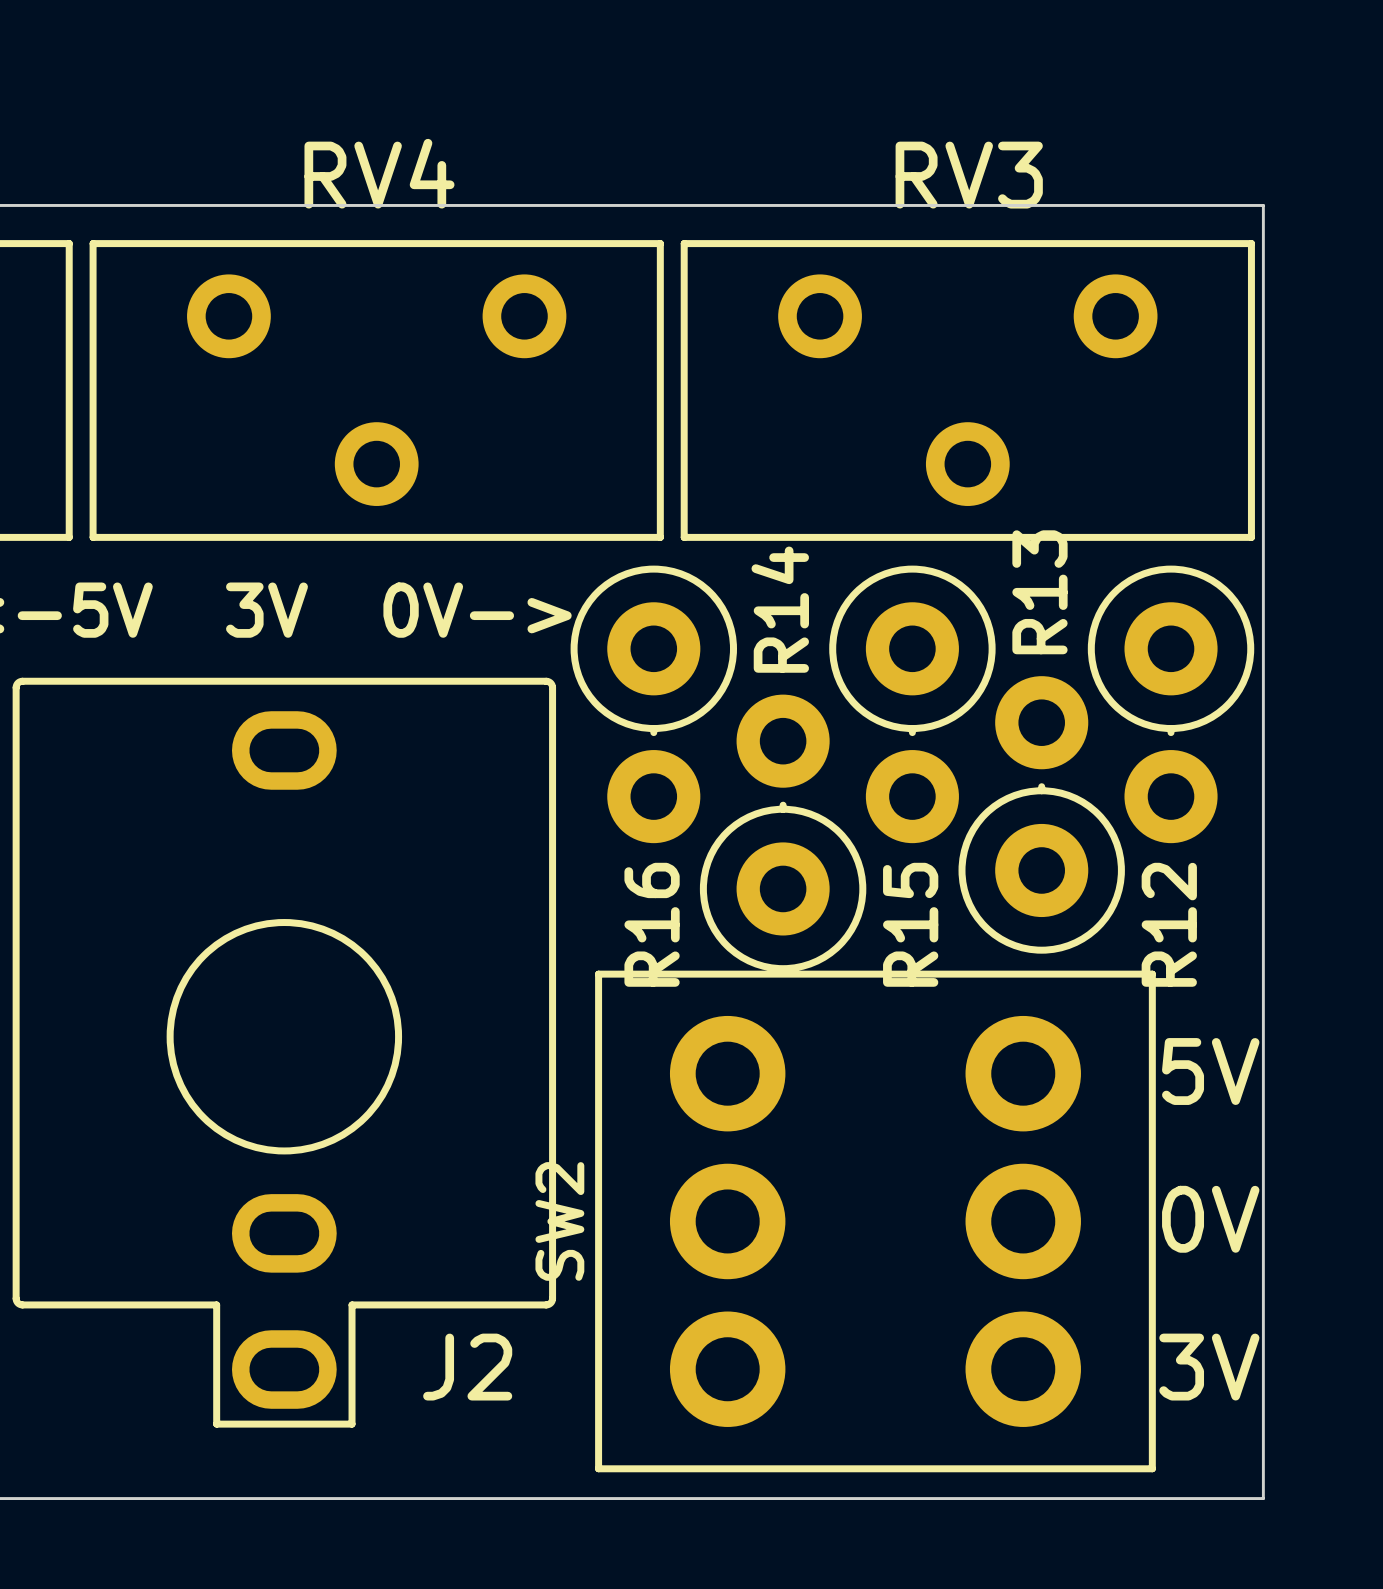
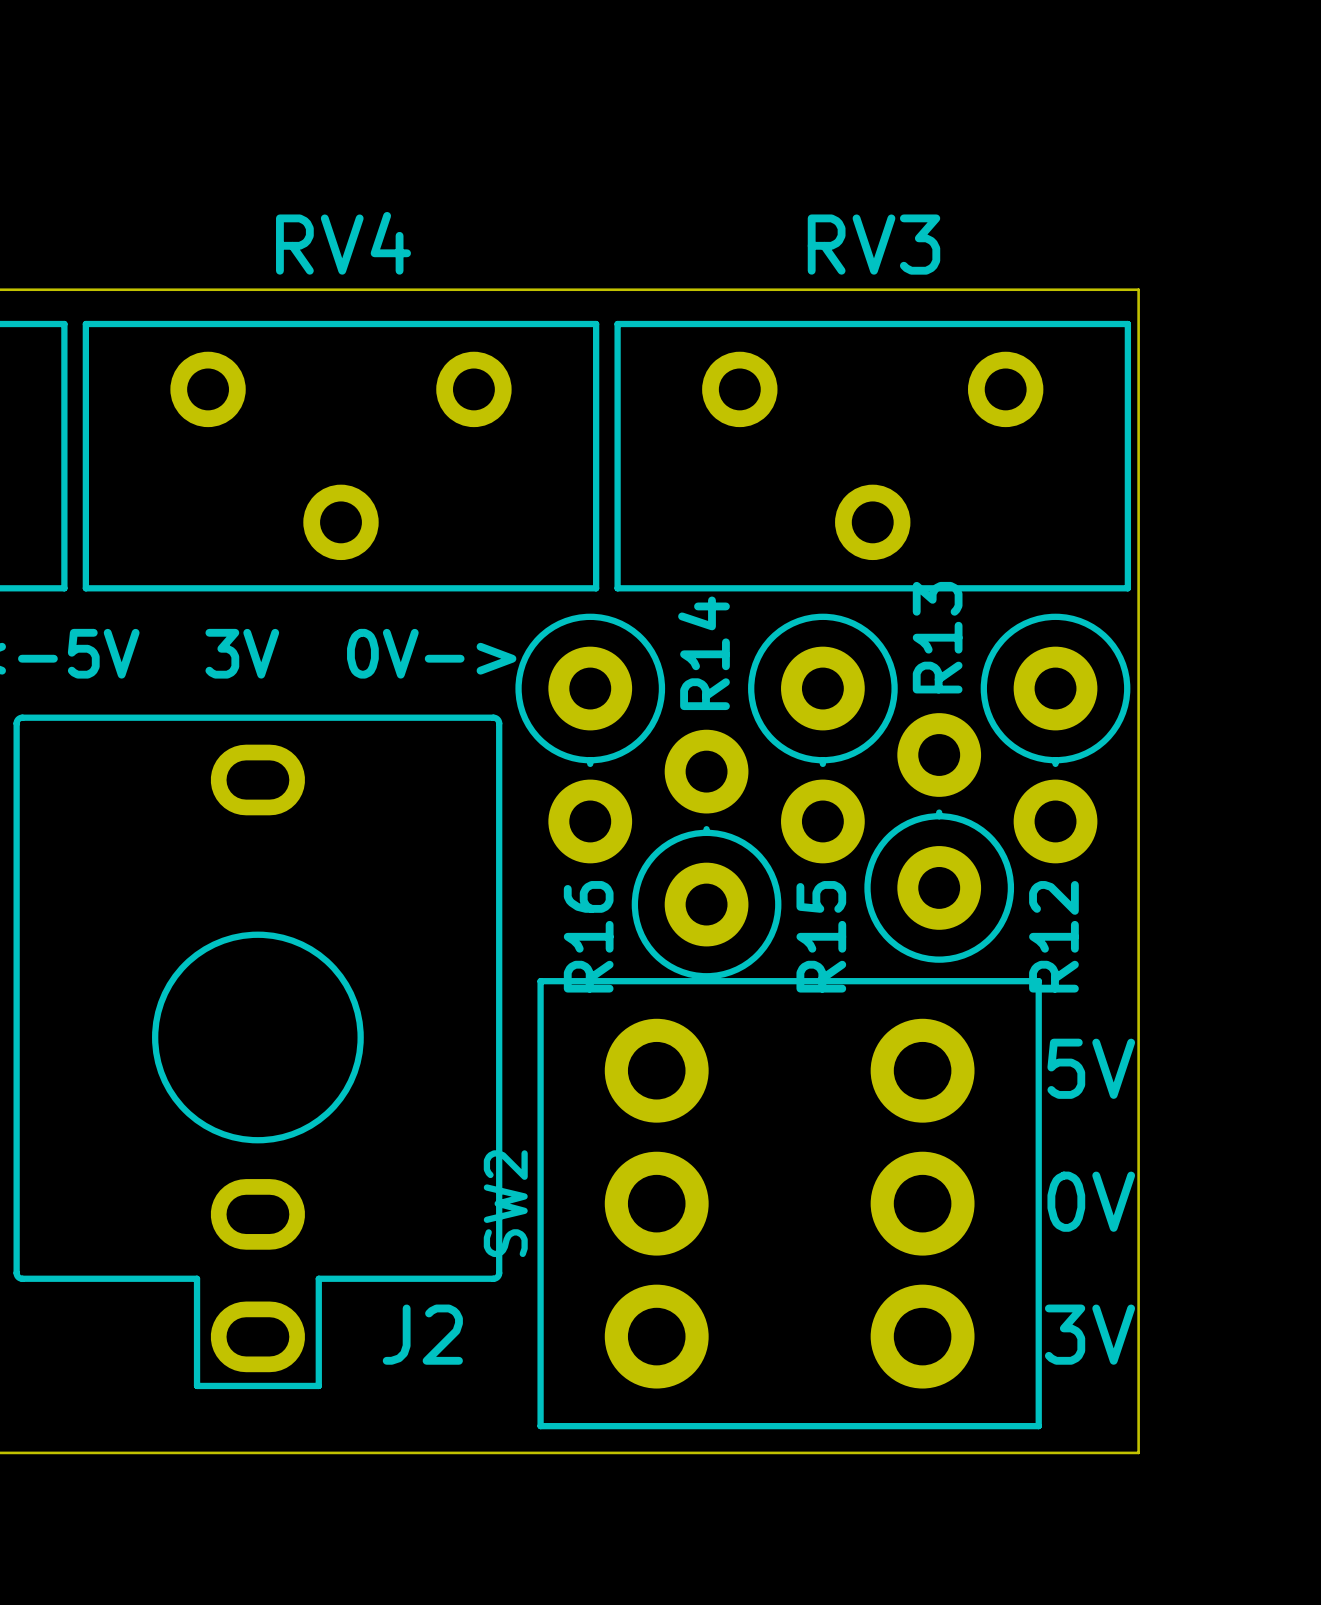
RV4 name position: RV4 (379, 173) -> RV4 (343, 243)
RV3 name position: RV3 (969, 175) -> RV3 (873, 244)

